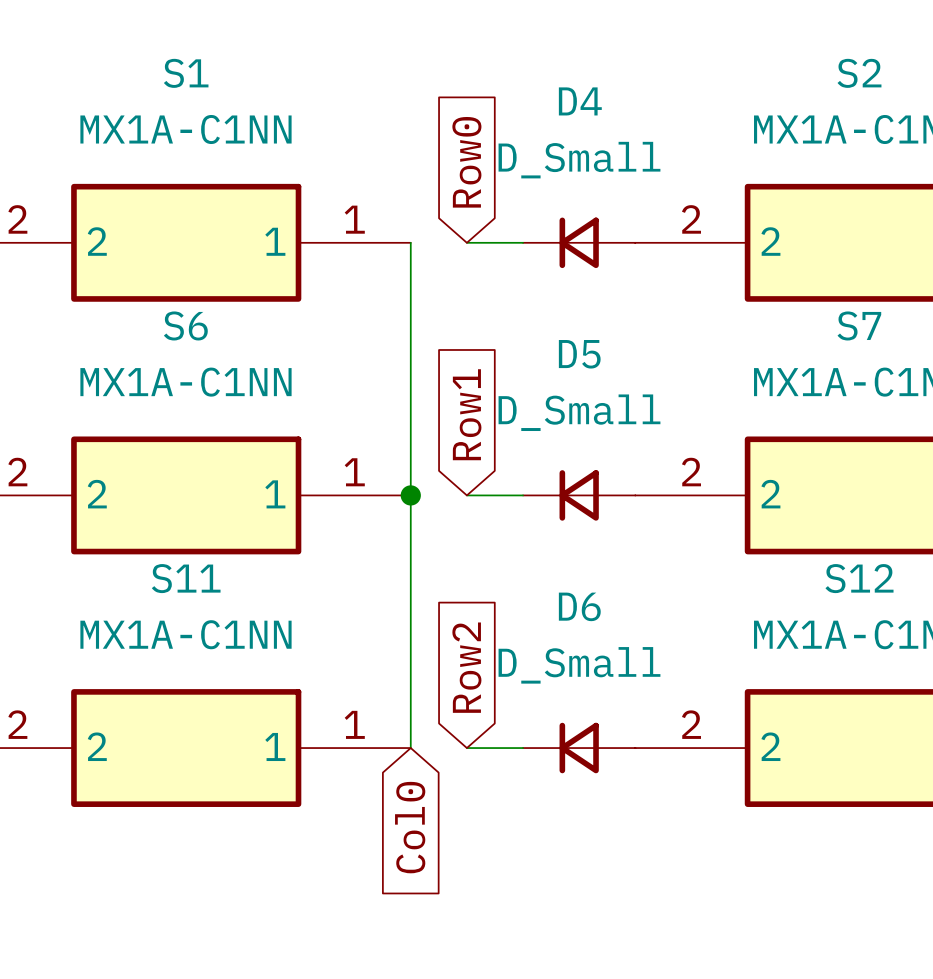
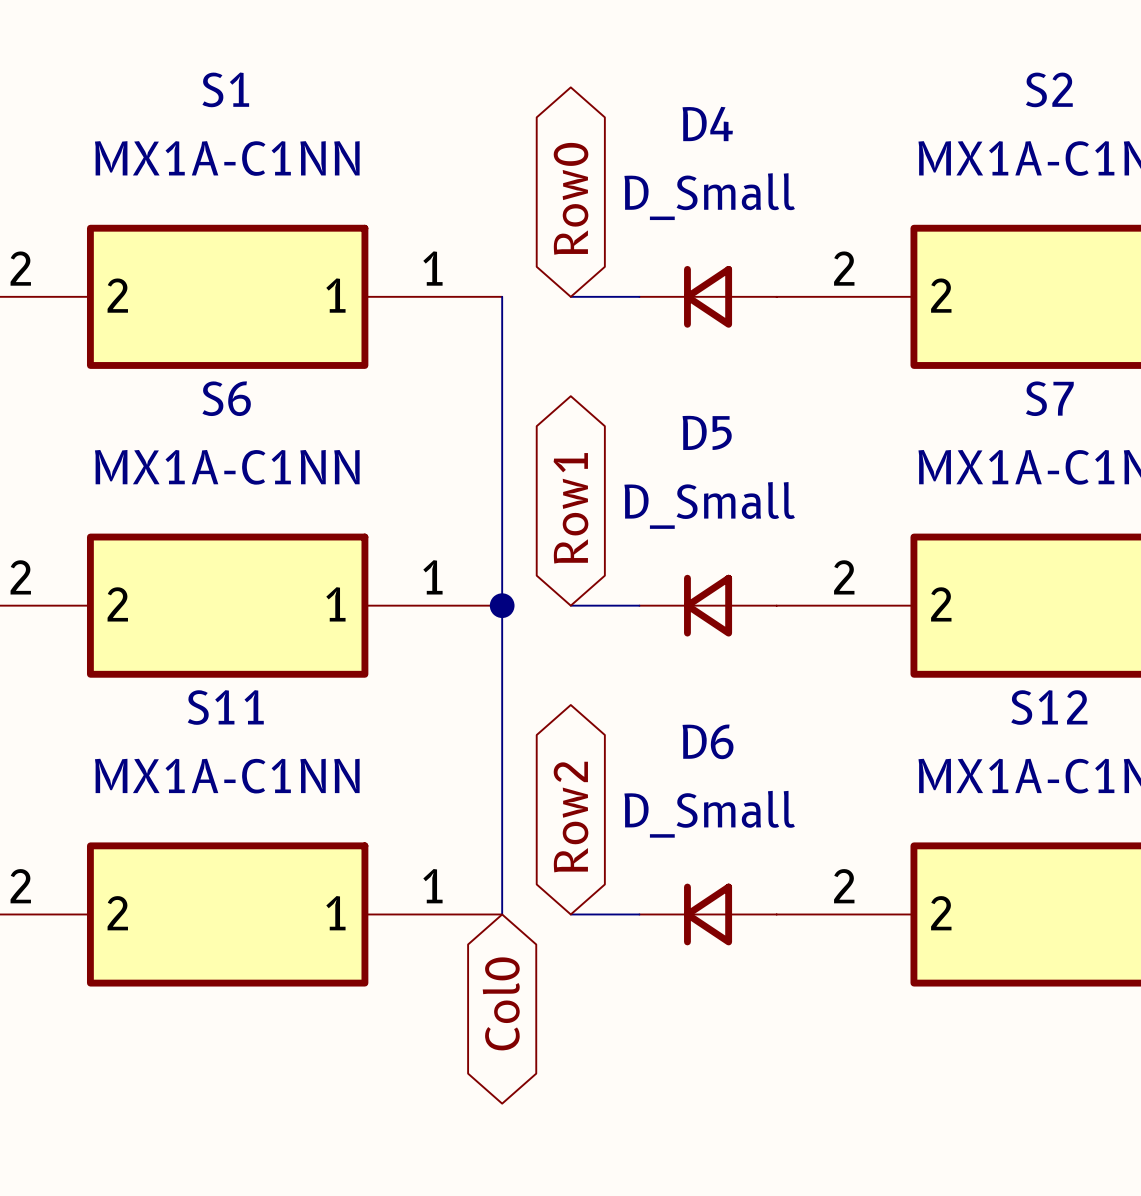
global label shape: input (466, 162) -> bidirectional (571, 198)
global label shape: input (467, 414) -> bidirectional (570, 508)
global label shape: input (466, 667) -> bidirectional (571, 817)
global label shape: input (410, 827) -> bidirectional (501, 1003)

